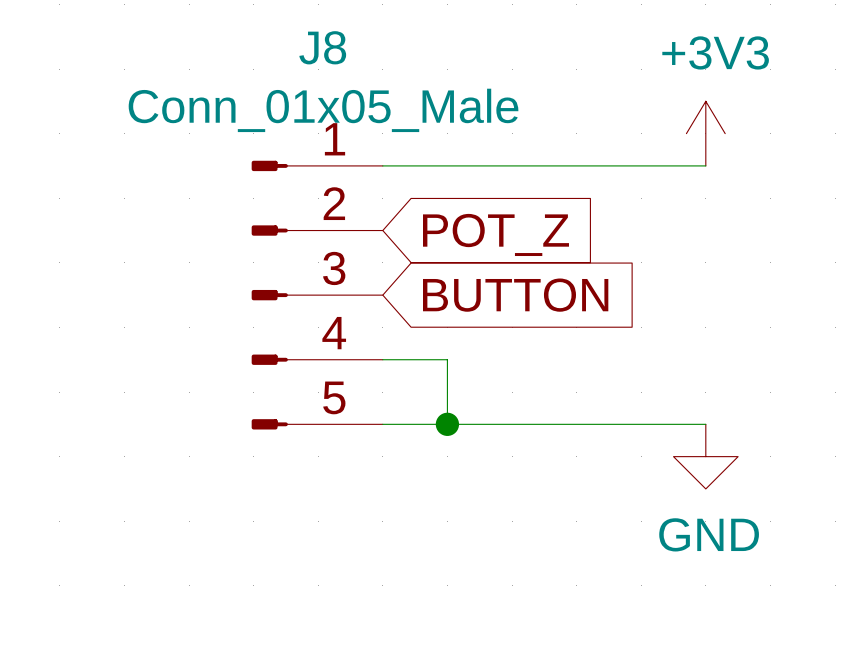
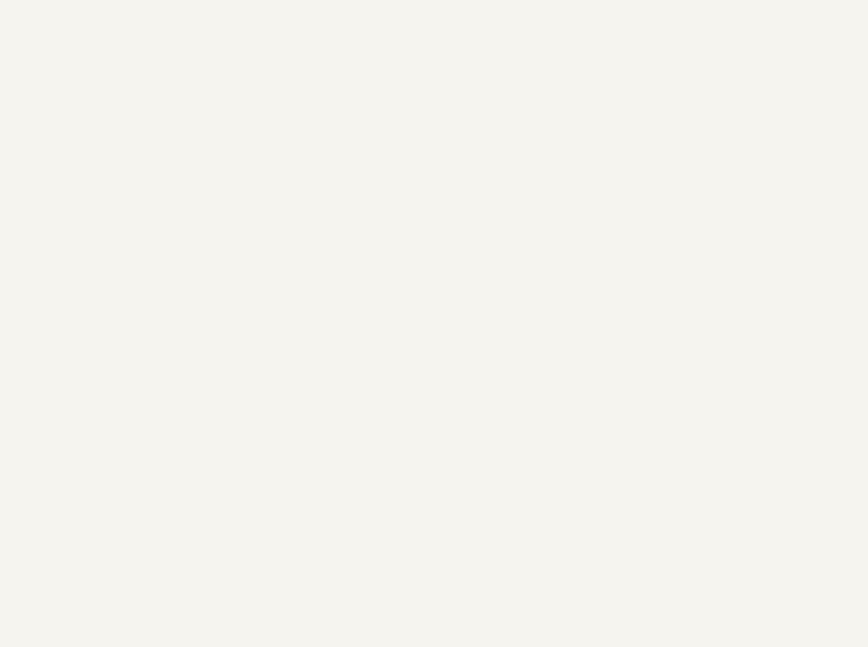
power symbol: +3V3 (705, 133) -> none
wire: (382, 165) (705, 165) -> none
global label: POT_Z (495, 234) -> none
J8: Conn_01x05_Male (317, 295) -> none
global label: BUTTON (515, 295) -> none
wire: (382, 359) (447, 359) (447, 424) -> none
wire: (382, 424) (705, 424) -> none
junction: (447, 424) -> none
power symbol: GND (705, 456) -> none

